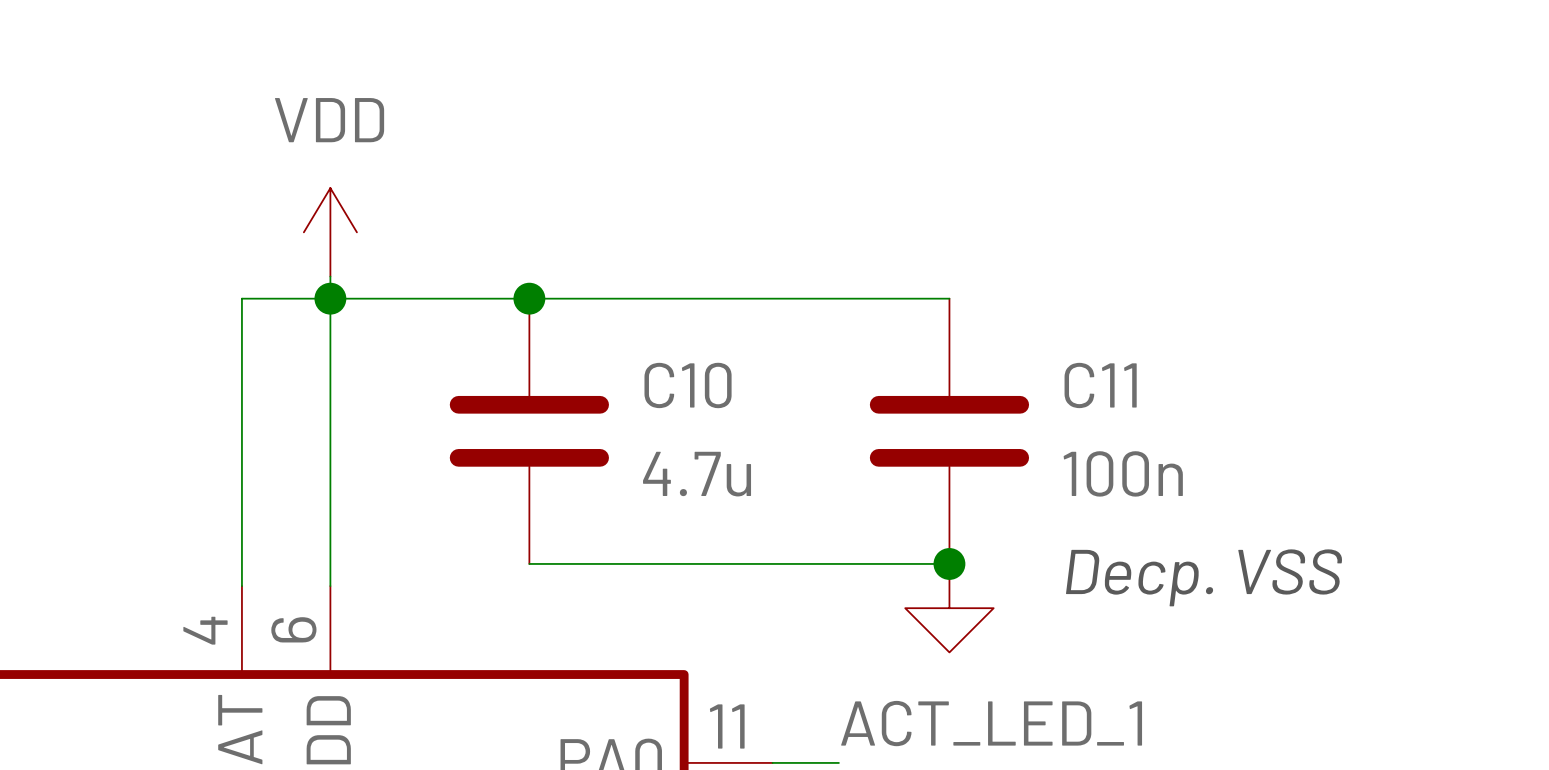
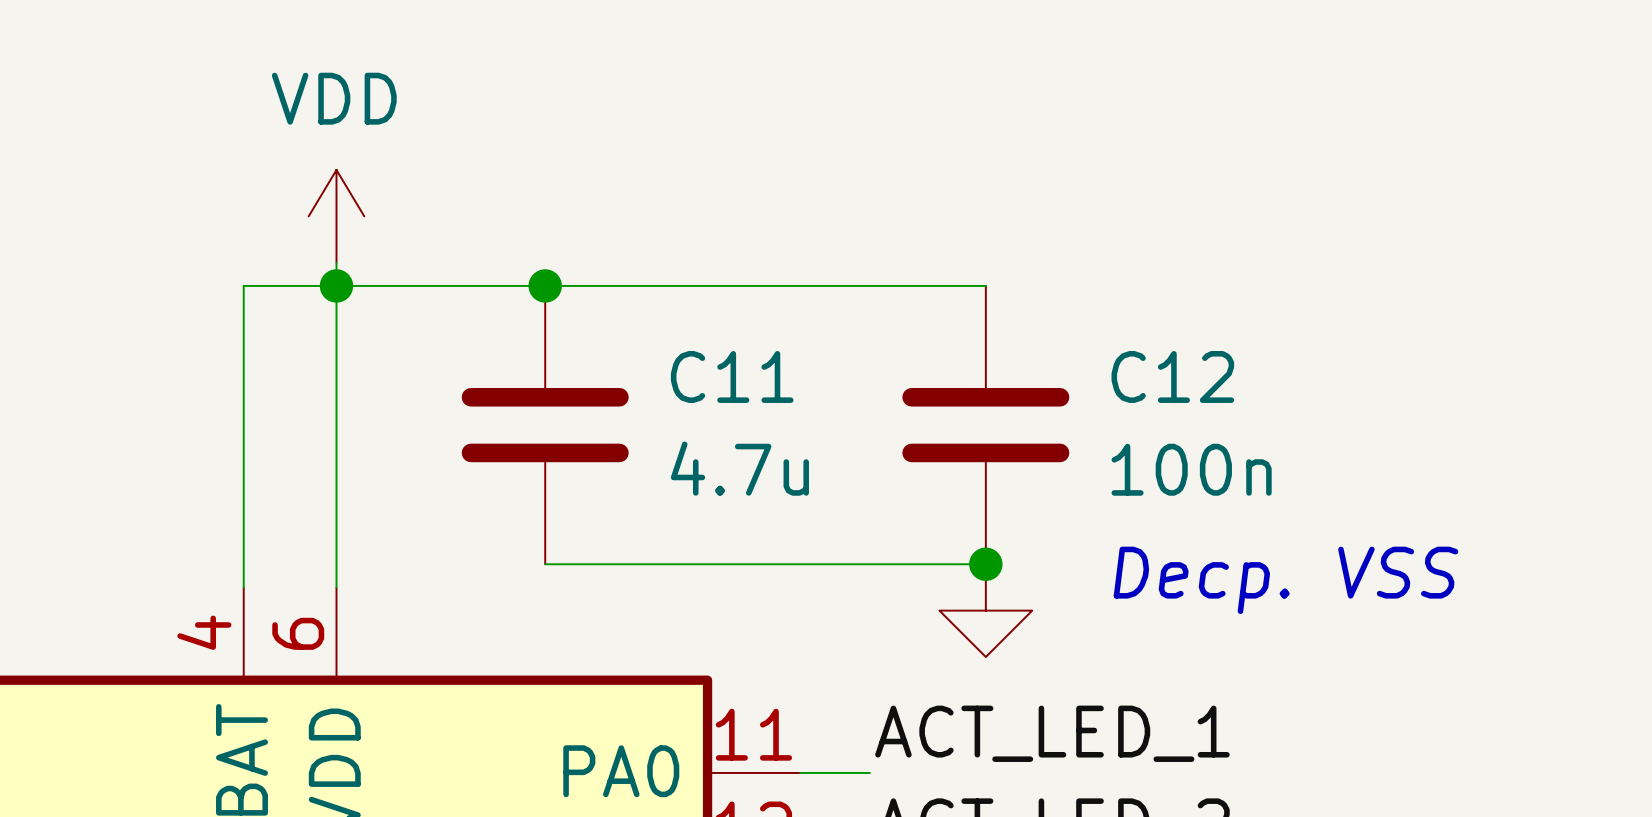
C10 name: C10 (688, 385) -> C11 (732, 376)
C11 name: C11 (1100, 385) -> C12 (1172, 376)

